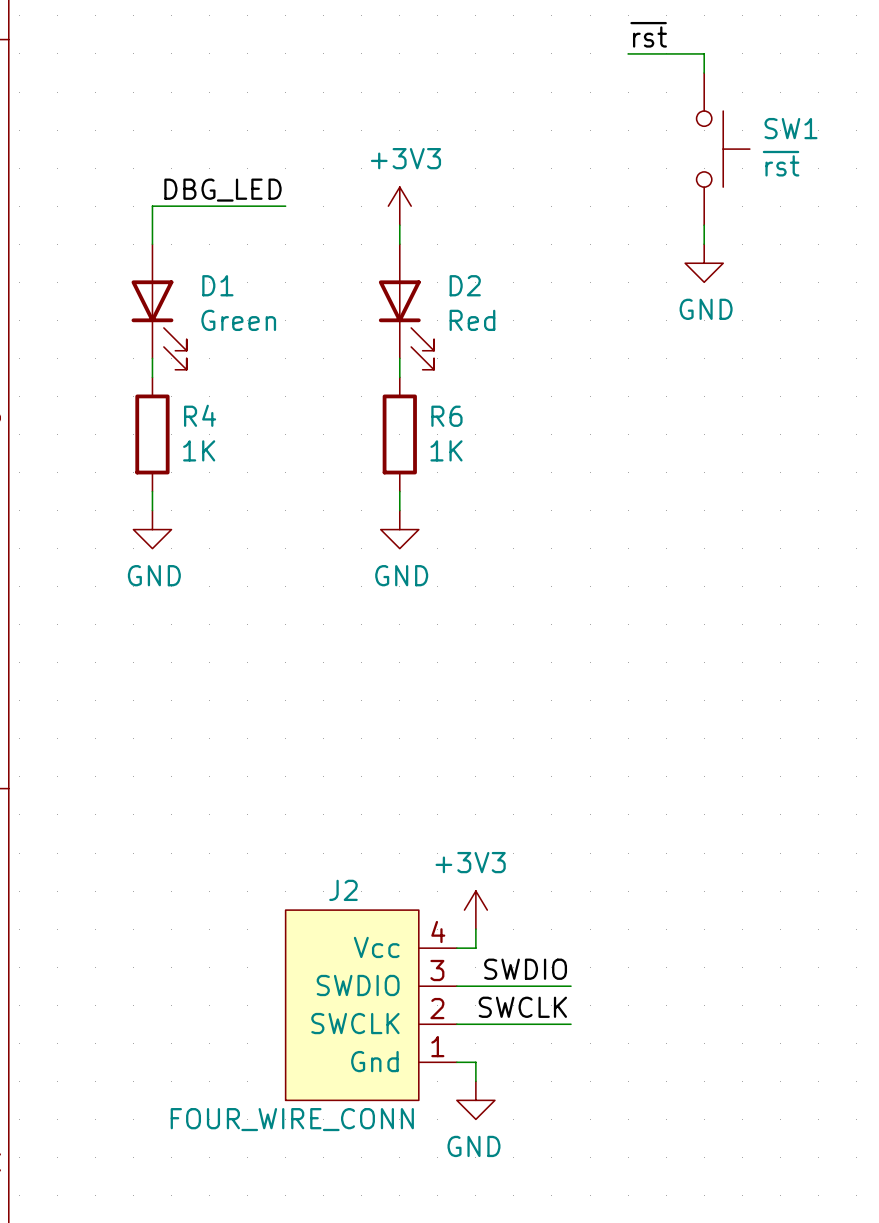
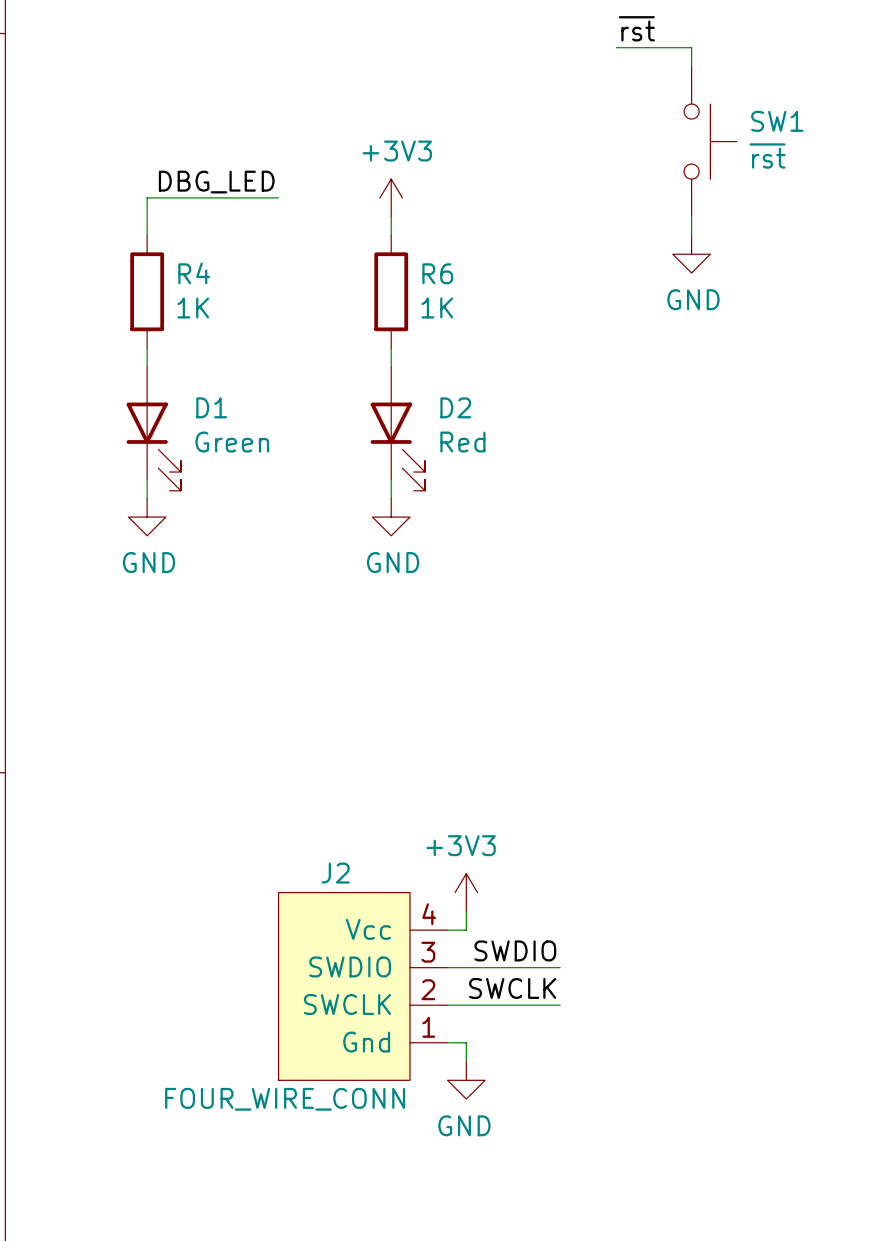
D1 position: (159, 307) -> (153, 428)
D2 position: (406, 307) -> (397, 428)
R4 position: (152, 434) -> (147, 291)
R6 position: (399, 434) -> (391, 291)

